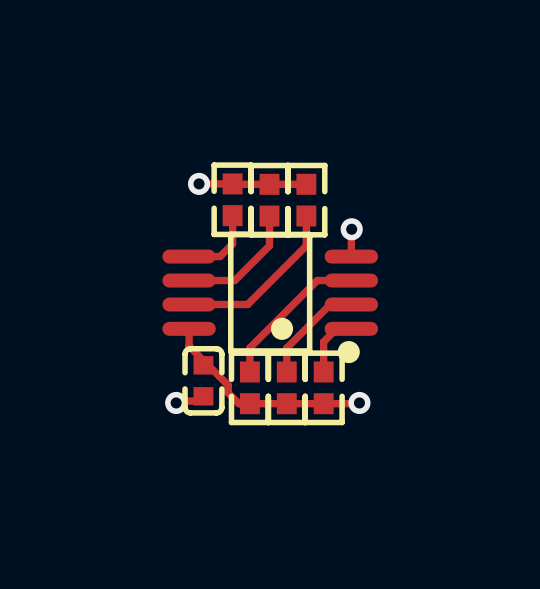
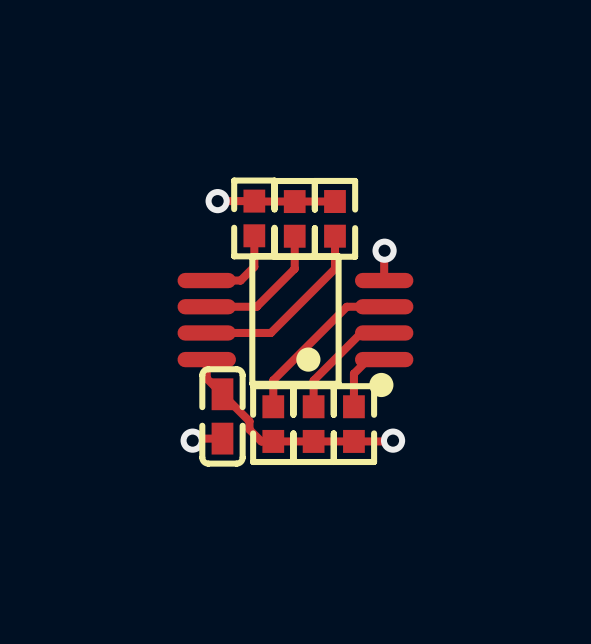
part footprint: [182, 345, 225, 416] -> [199, 366, 246, 467]

